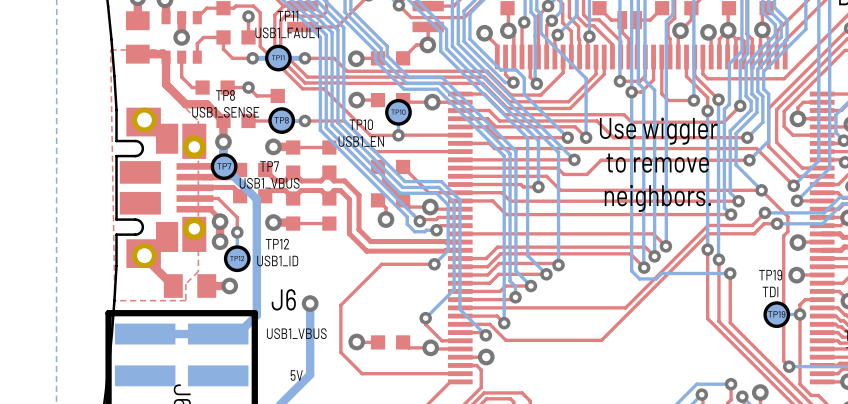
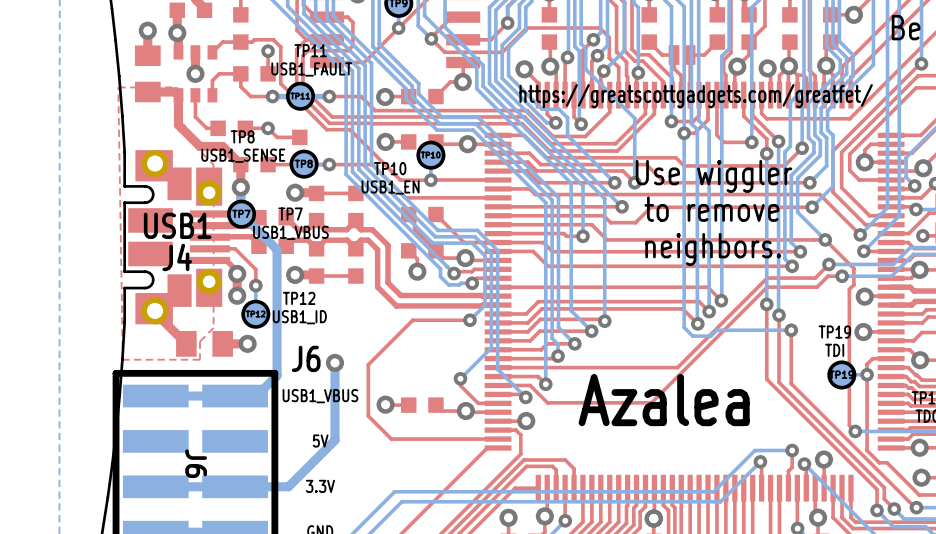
text: none -> https://greatscottgadgets.com/greatfet/ (696, 96)
text: none -> USB1 (177, 225)
text: none -> J4 (177, 257)
text: none -> Azalea (664, 400)

